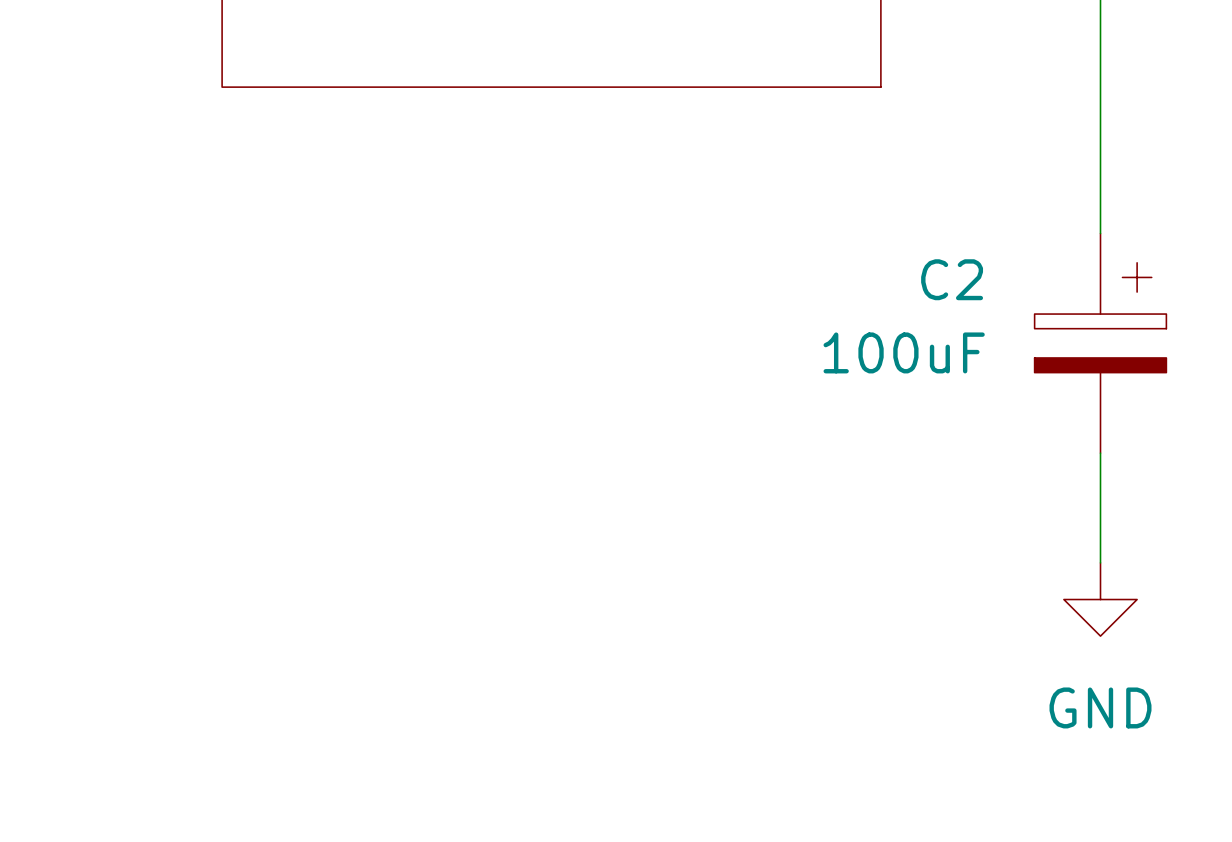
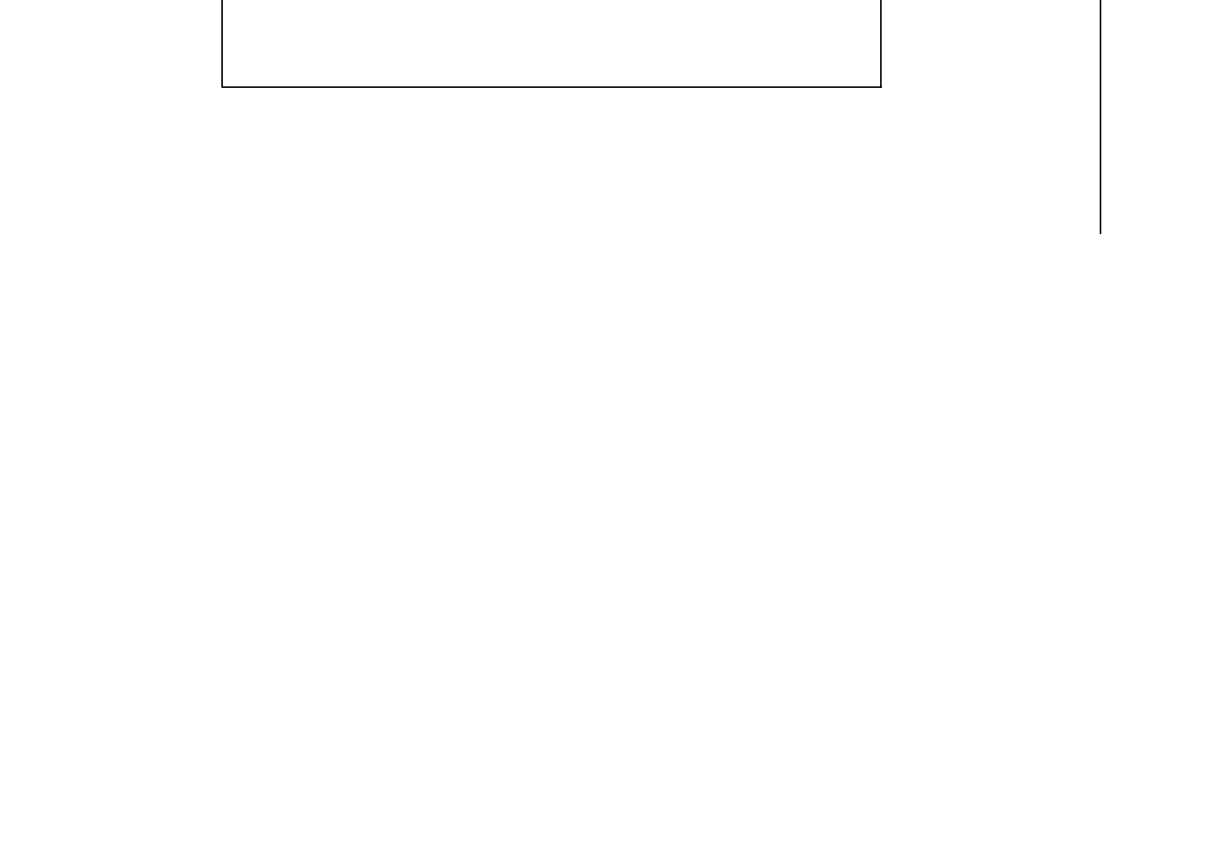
C2: 100uF (1100, 343) -> none
wire: (1100, 453) (1100, 562) -> none
power symbol: GND (1100, 599) -> none

